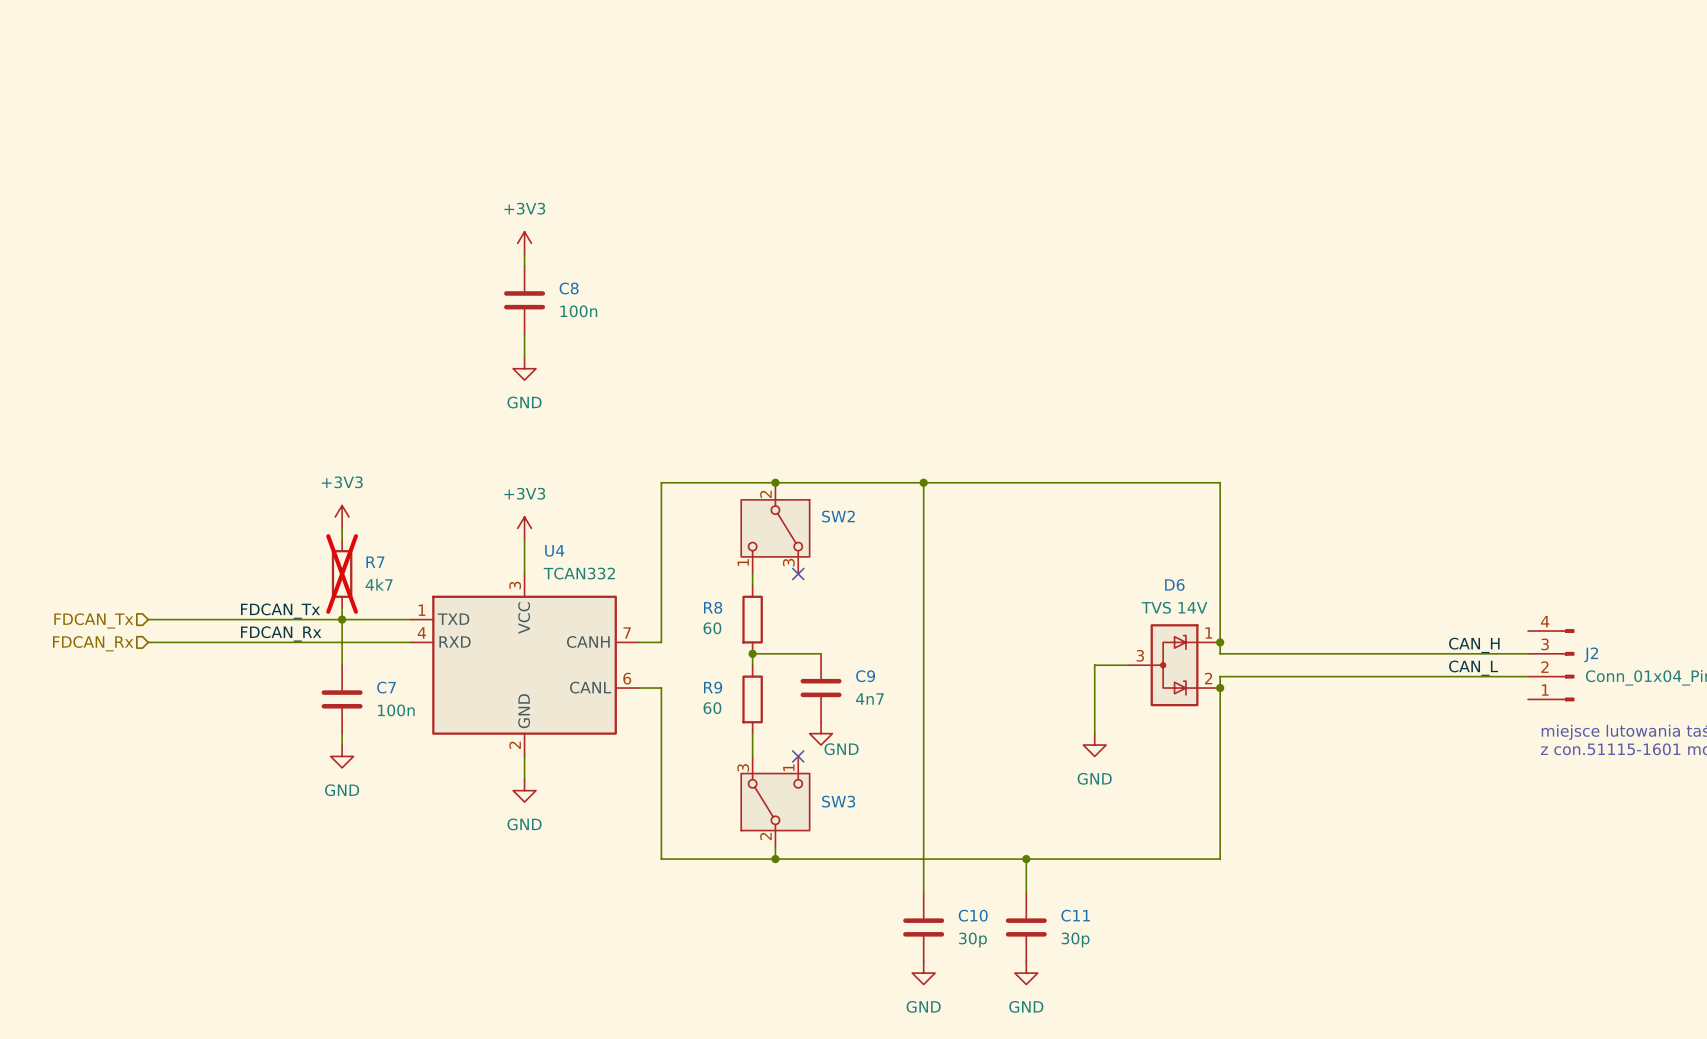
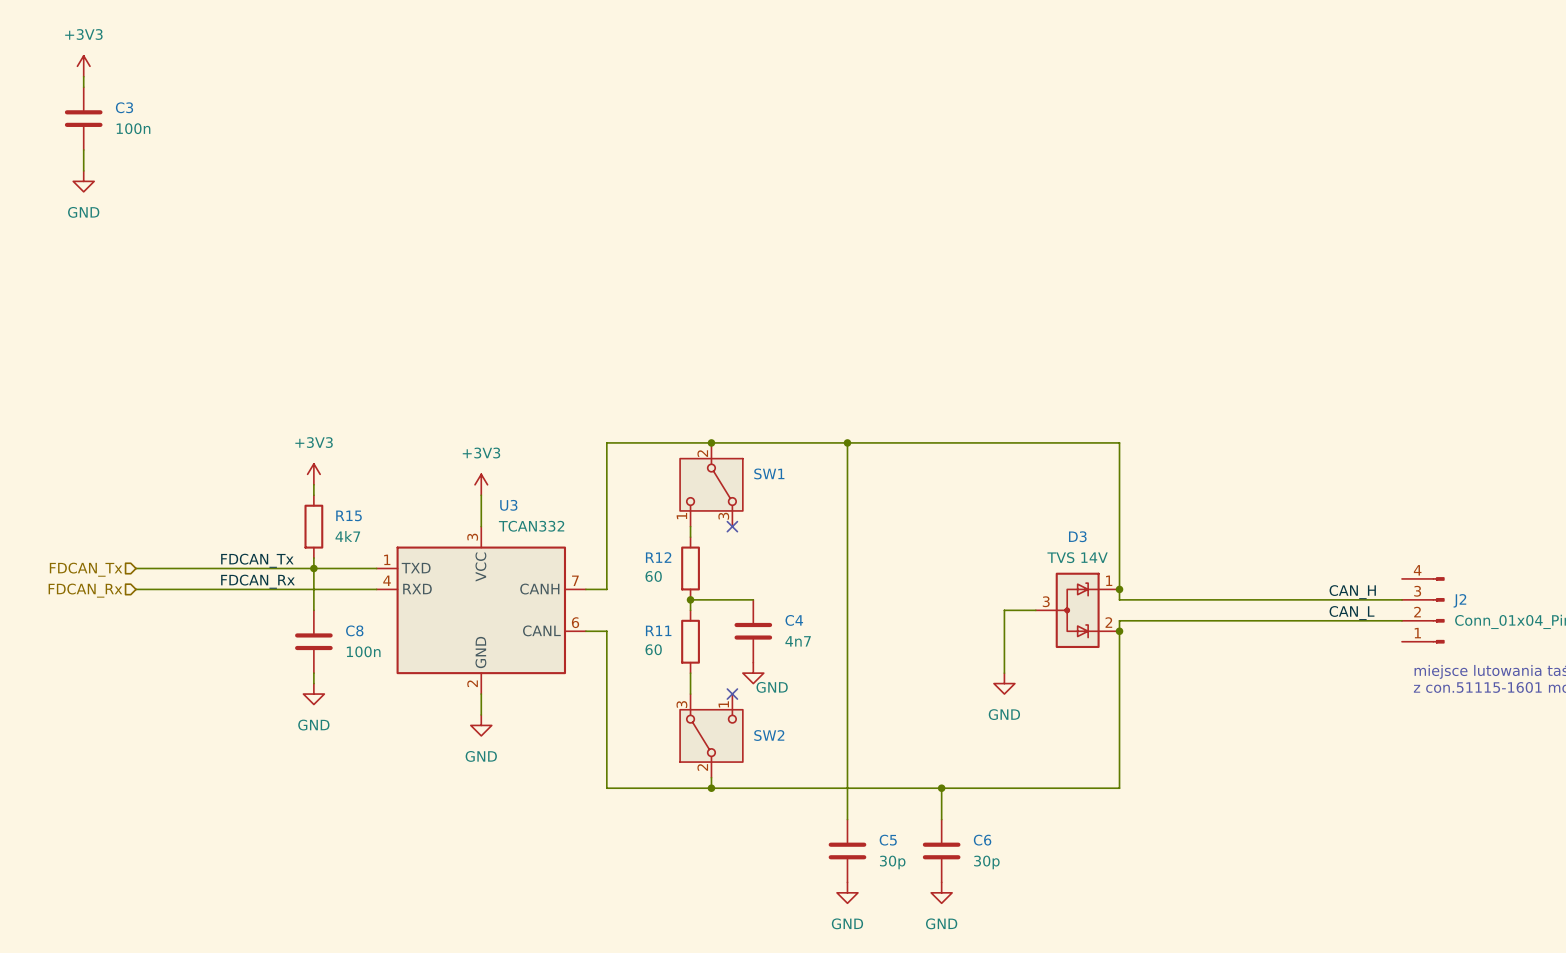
power symbol: none -> +3V3 (83, 66)
wire: none -> (83, 76) (83, 87)
C3: none -> 100n (83, 118)
wire: none -> (83, 149) (83, 170)
power symbol: none -> GND (83, 181)
power symbol: +3V3 (524, 243) -> none
wire: (524, 254) (524, 266) -> none
C8: 100n (524, 300) -> none
wire: (524, 334) (524, 357) -> none
power symbol: GND (524, 368) -> none
SW2 name: SW2 (838, 516) -> SW1 (769, 473)
U4 name: U4 (554, 550) -> U3 (508, 505)
R7 name: R7 (375, 562) -> R15 (349, 515)
R7 do-not-place cross: (342, 573) -> none
D6 name: D6 (1174, 584) -> D3 (1077, 536)
R8 name: R8 (713, 607) -> R12 (658, 557)
C9 name: C9 (865, 676) -> C4 (794, 620)
C7 name: C7 (386, 687) -> C8 (354, 630)
R9 name: R9 (713, 687) -> R11 (658, 630)
SW3 name: SW3 (838, 801) -> SW2 (769, 735)
C10 name: C10 (973, 915) -> C5 (888, 840)
C11 name: C11 (1075, 915) -> C6 (982, 840)

